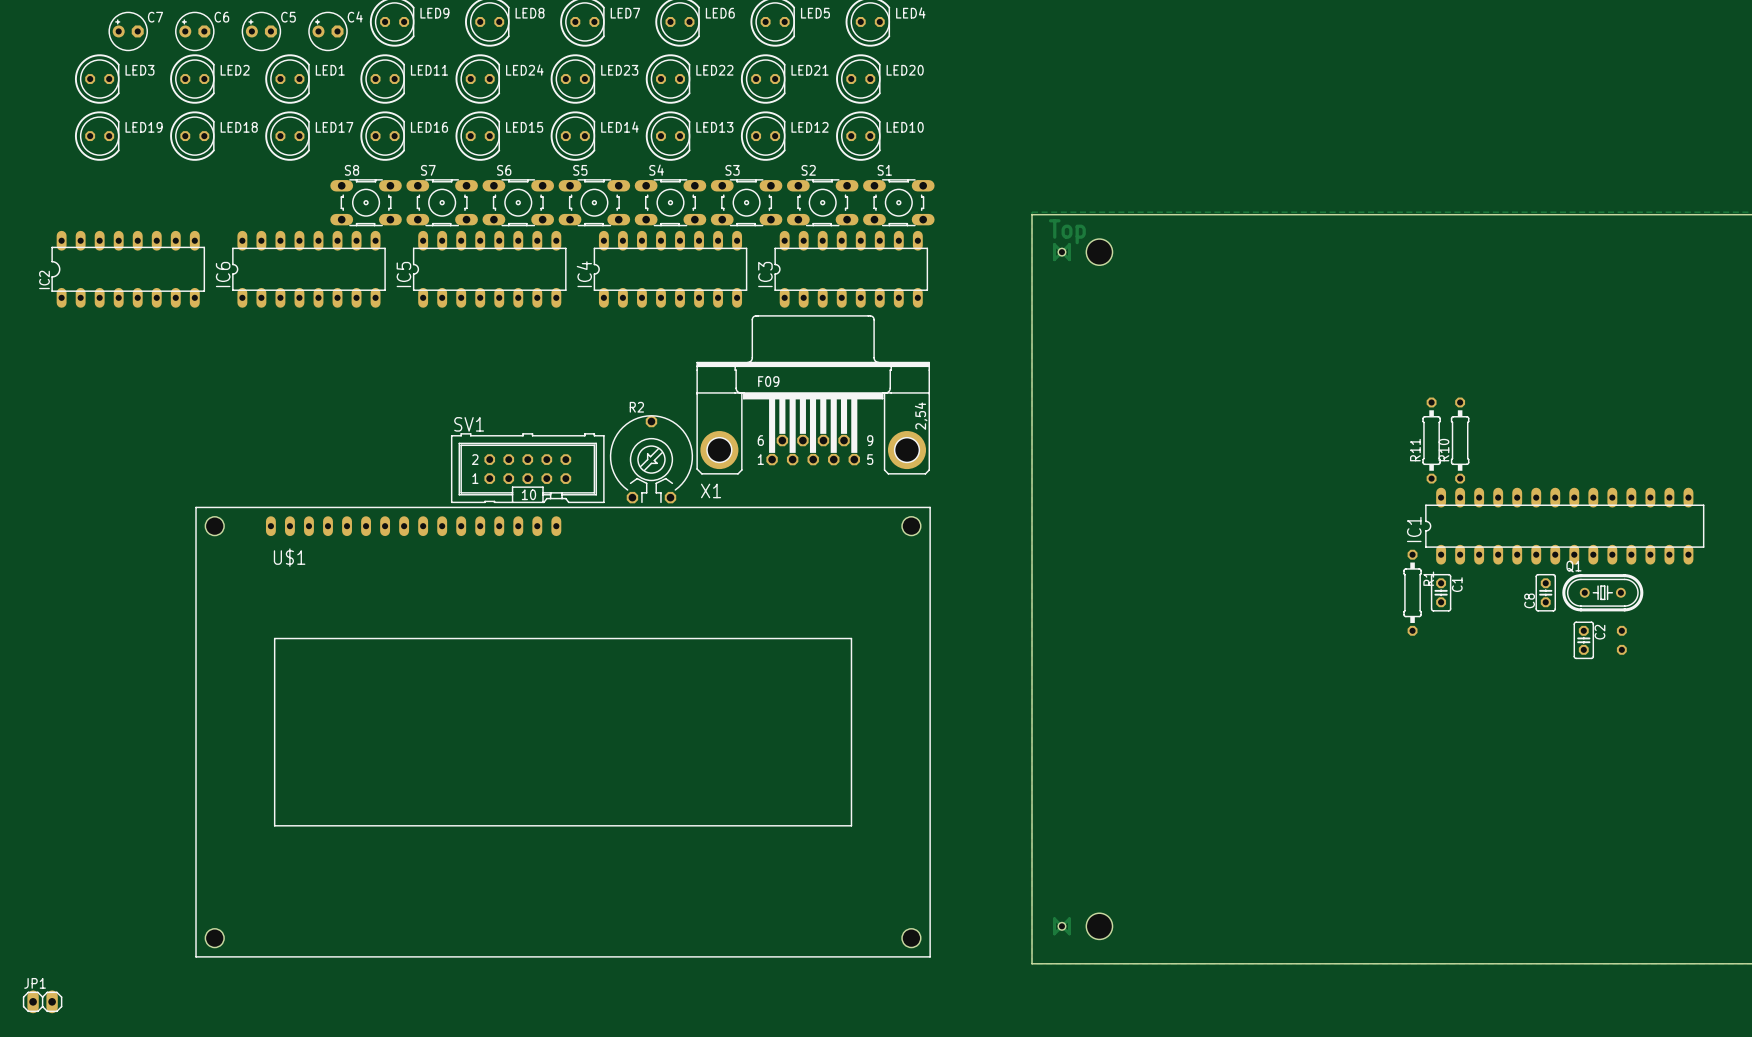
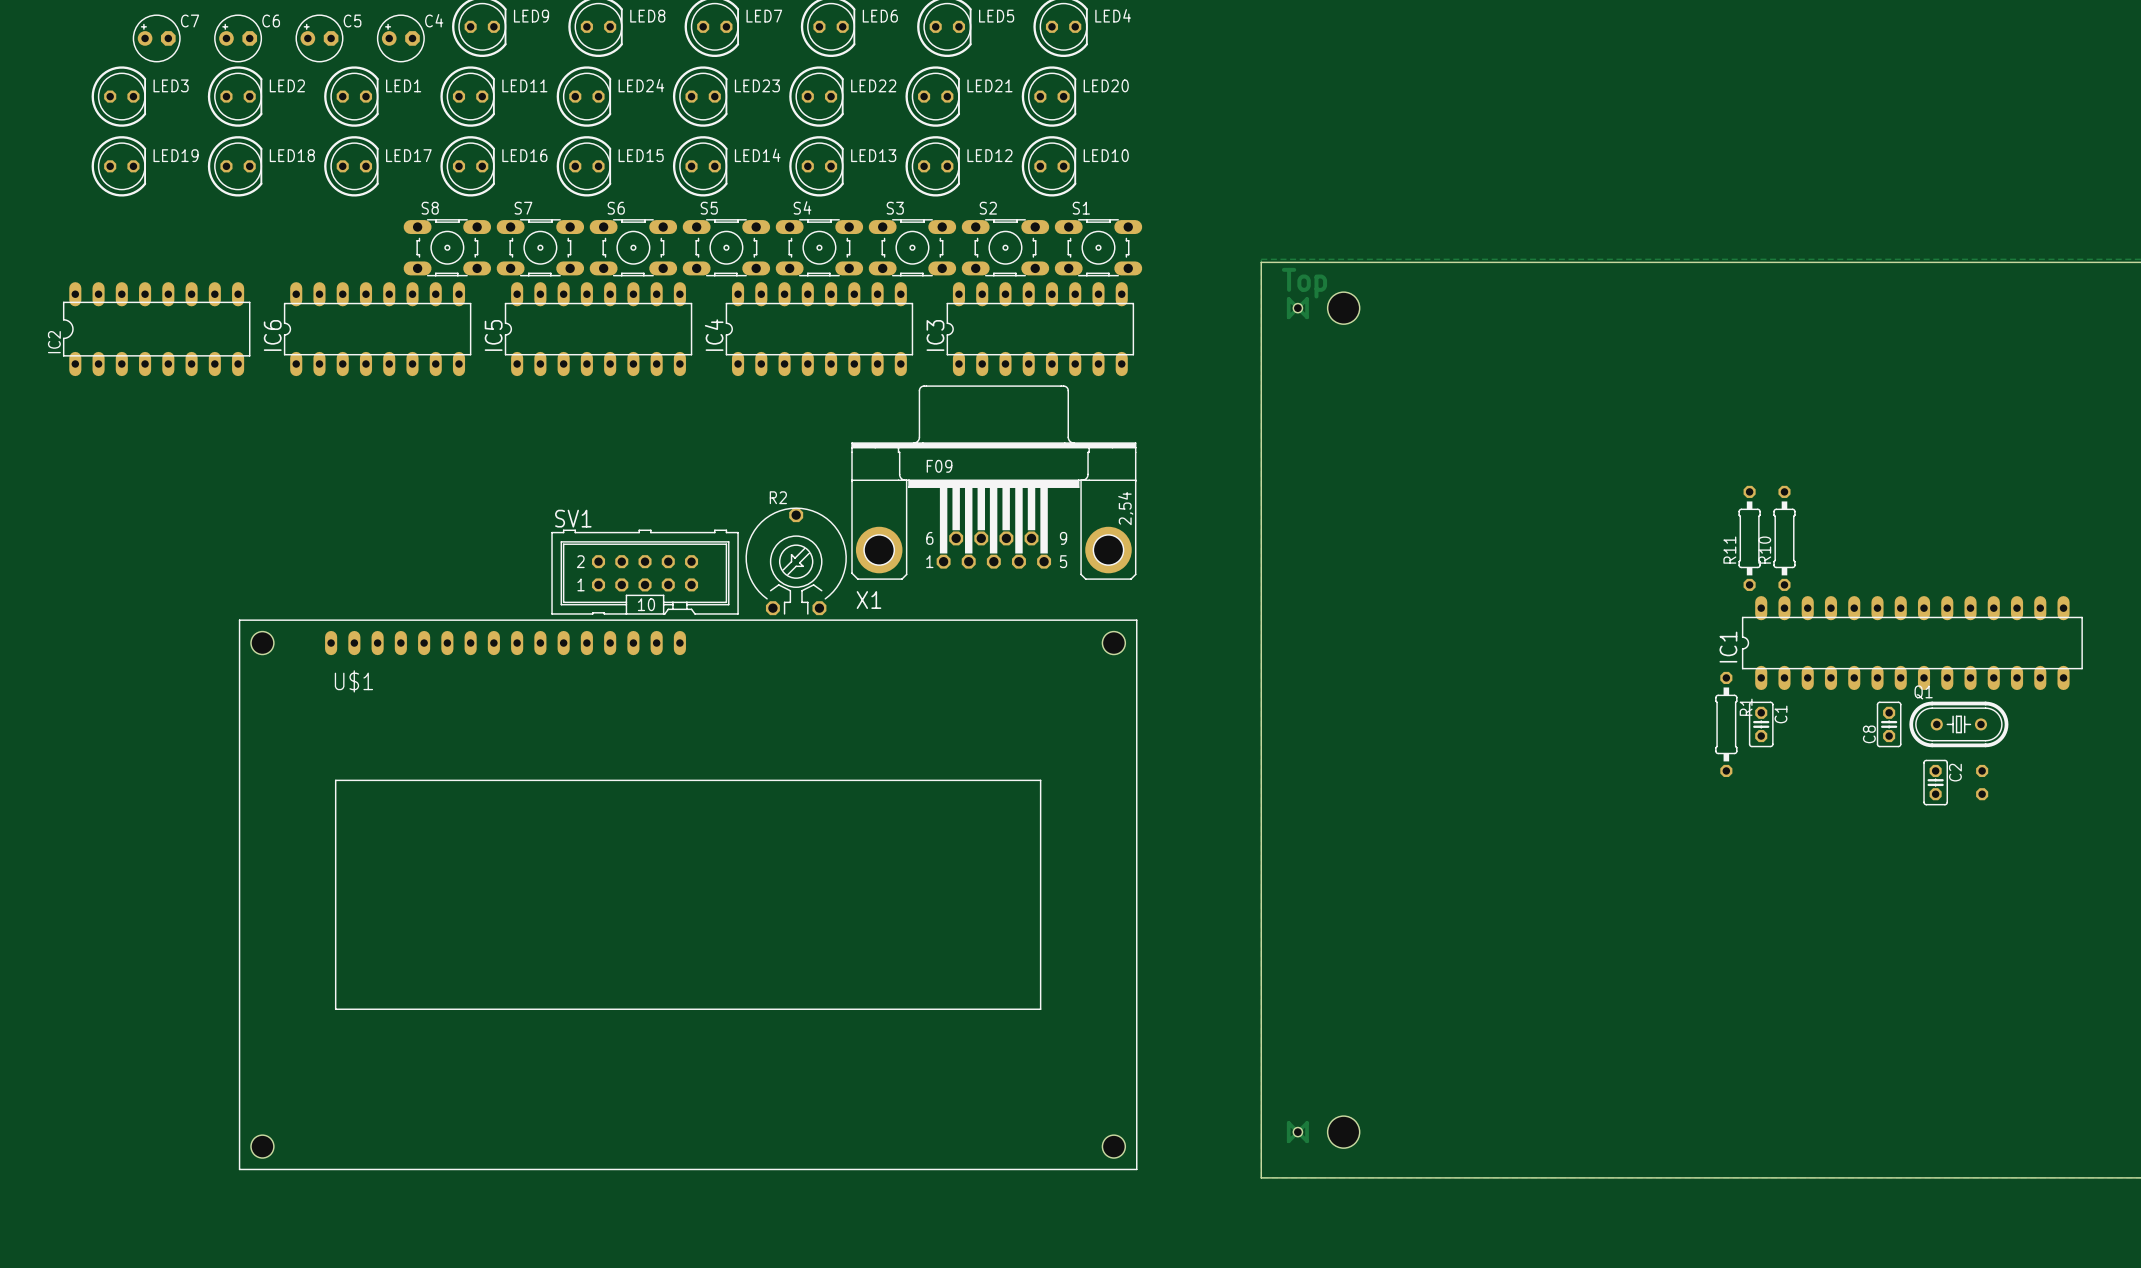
JP1: (42, 1001) -> none

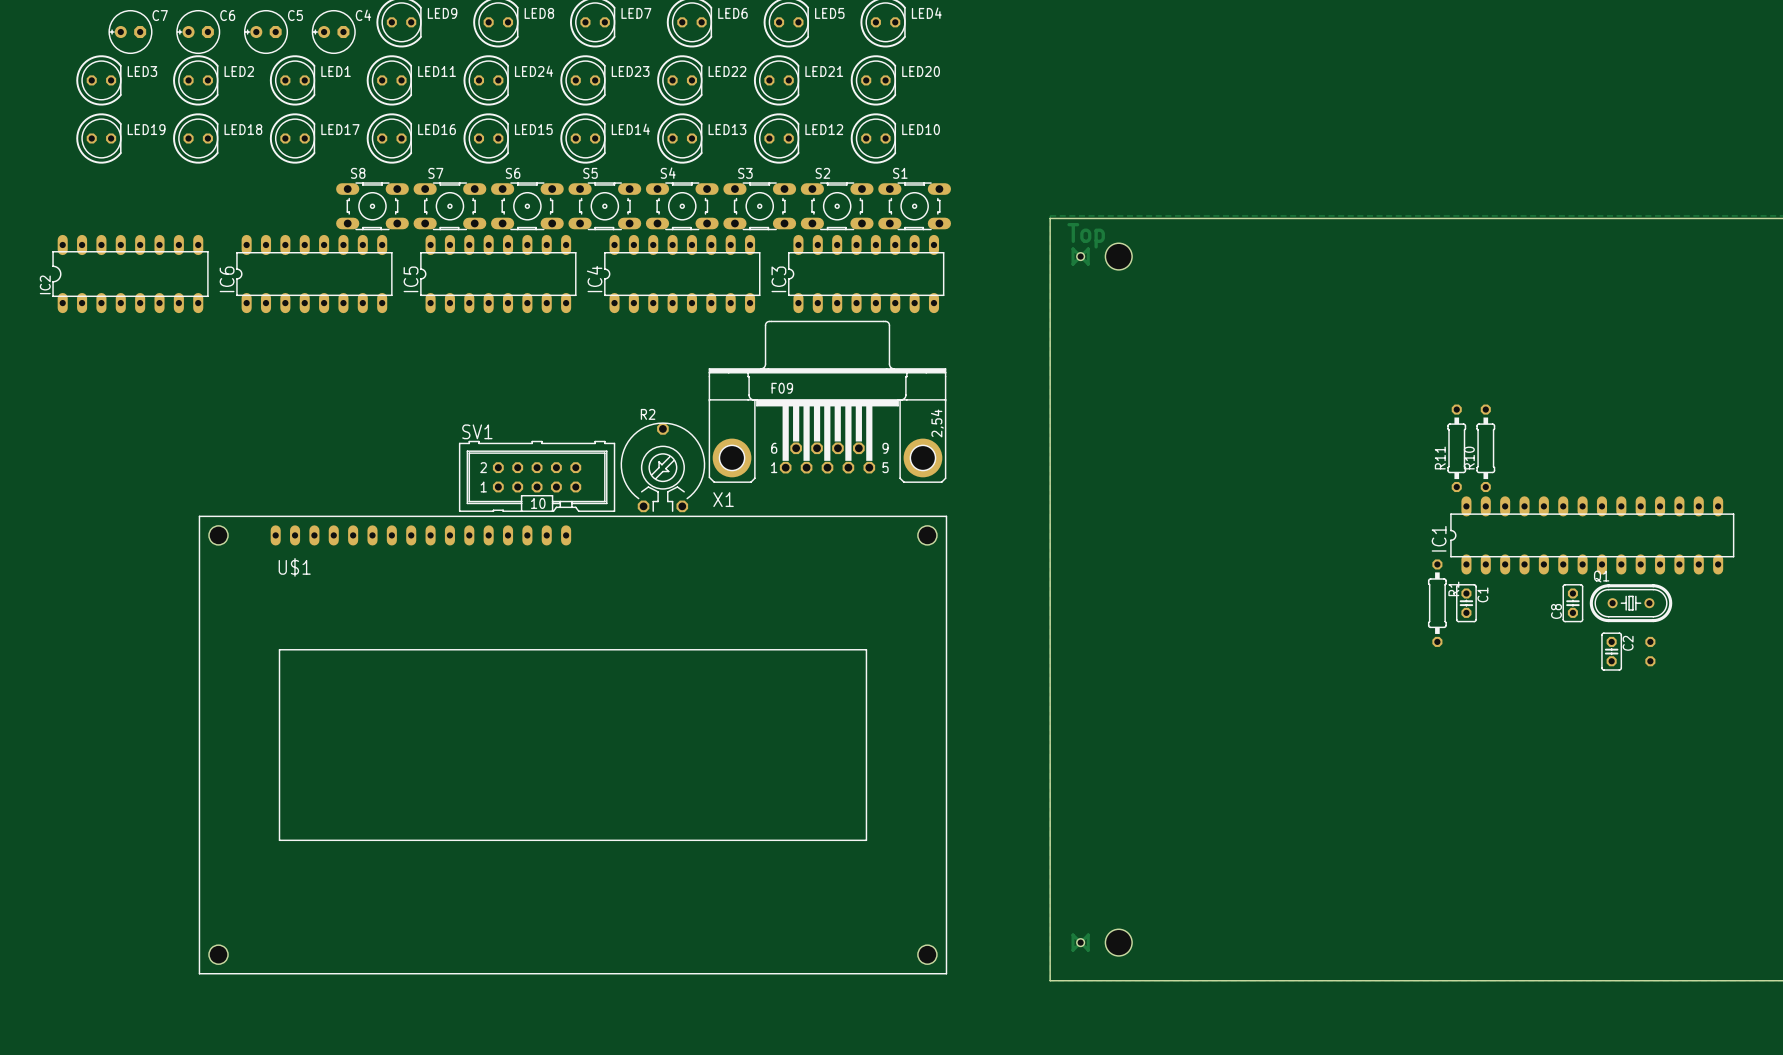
C7 footprint: [132, 14, 181, 63] -> [108, 10, 153, 54]
C6 footprint: [214, 14, 263, 63] -> [176, 10, 221, 54]
C5 footprint: [295, 14, 344, 63] -> [244, 10, 288, 54]
C4 footprint: [376, 14, 425, 63] -> [311, 10, 356, 54]

